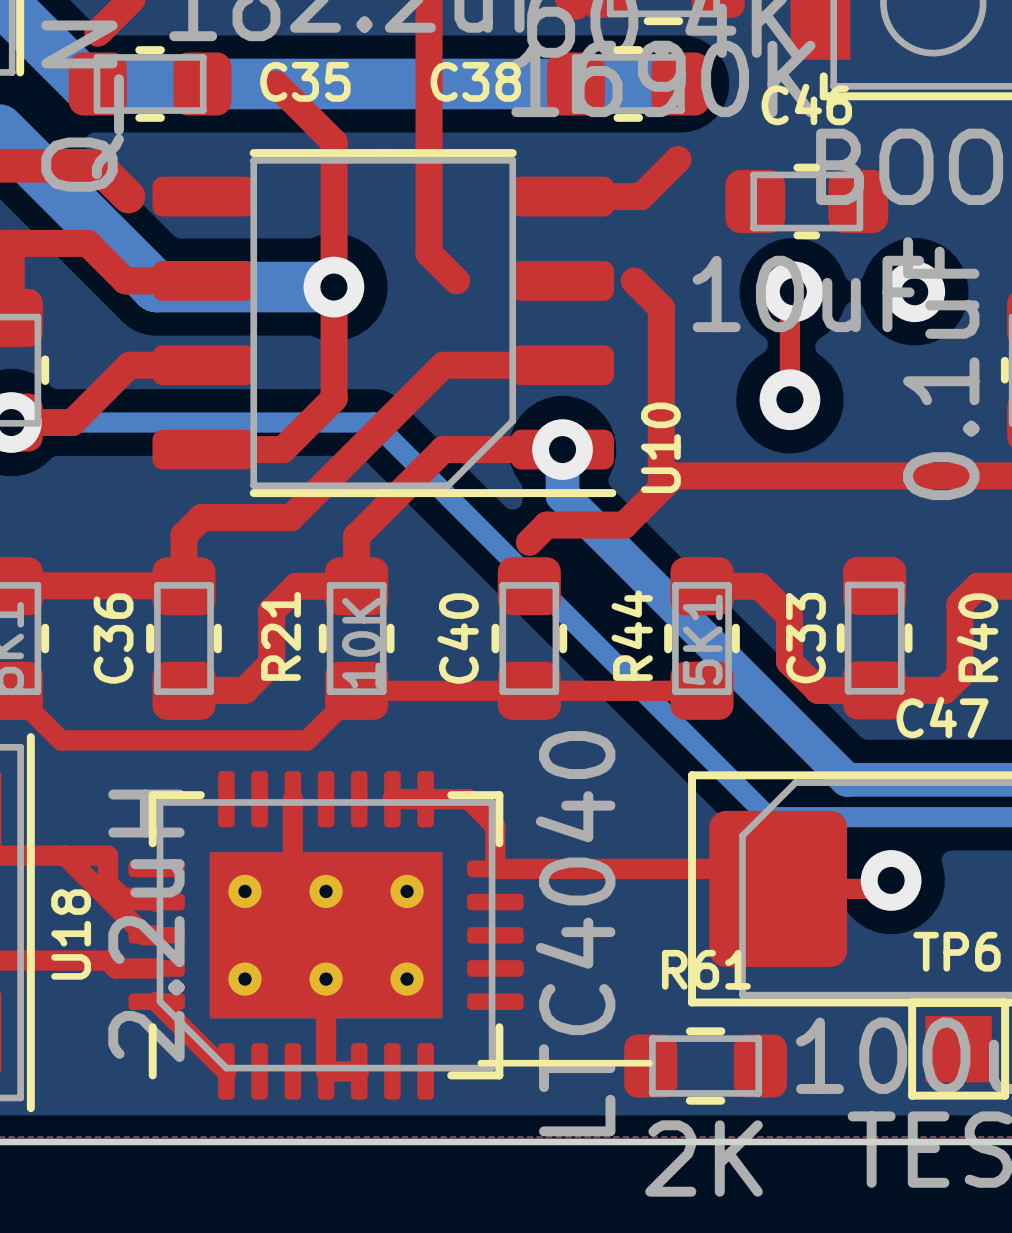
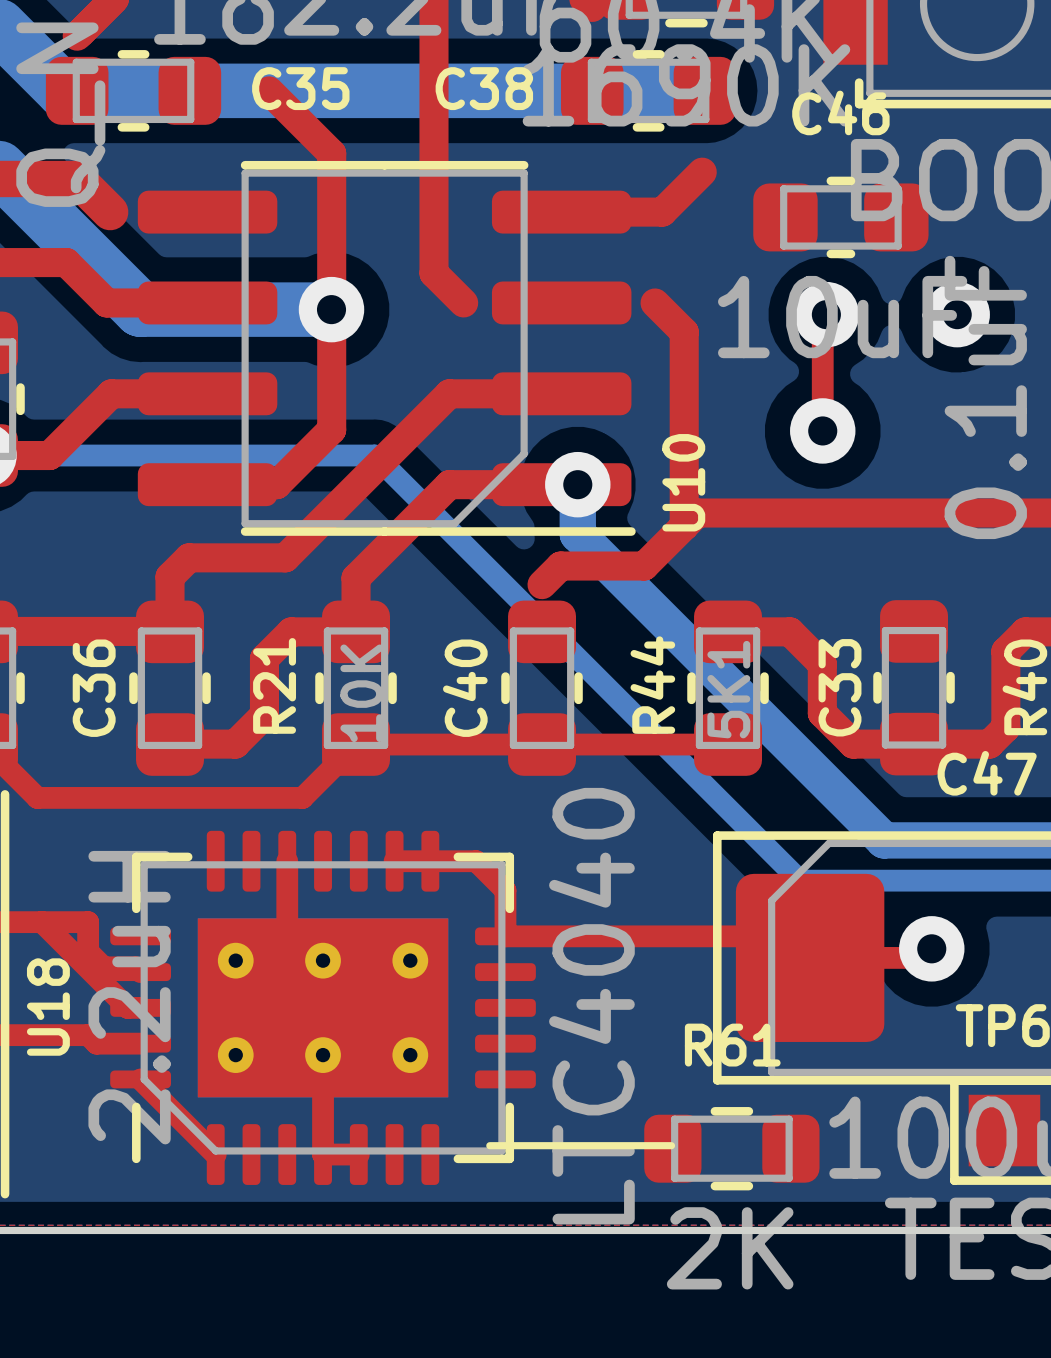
U10 footprint: [152, 149, 617, 498] -> [137, 160, 636, 536]

